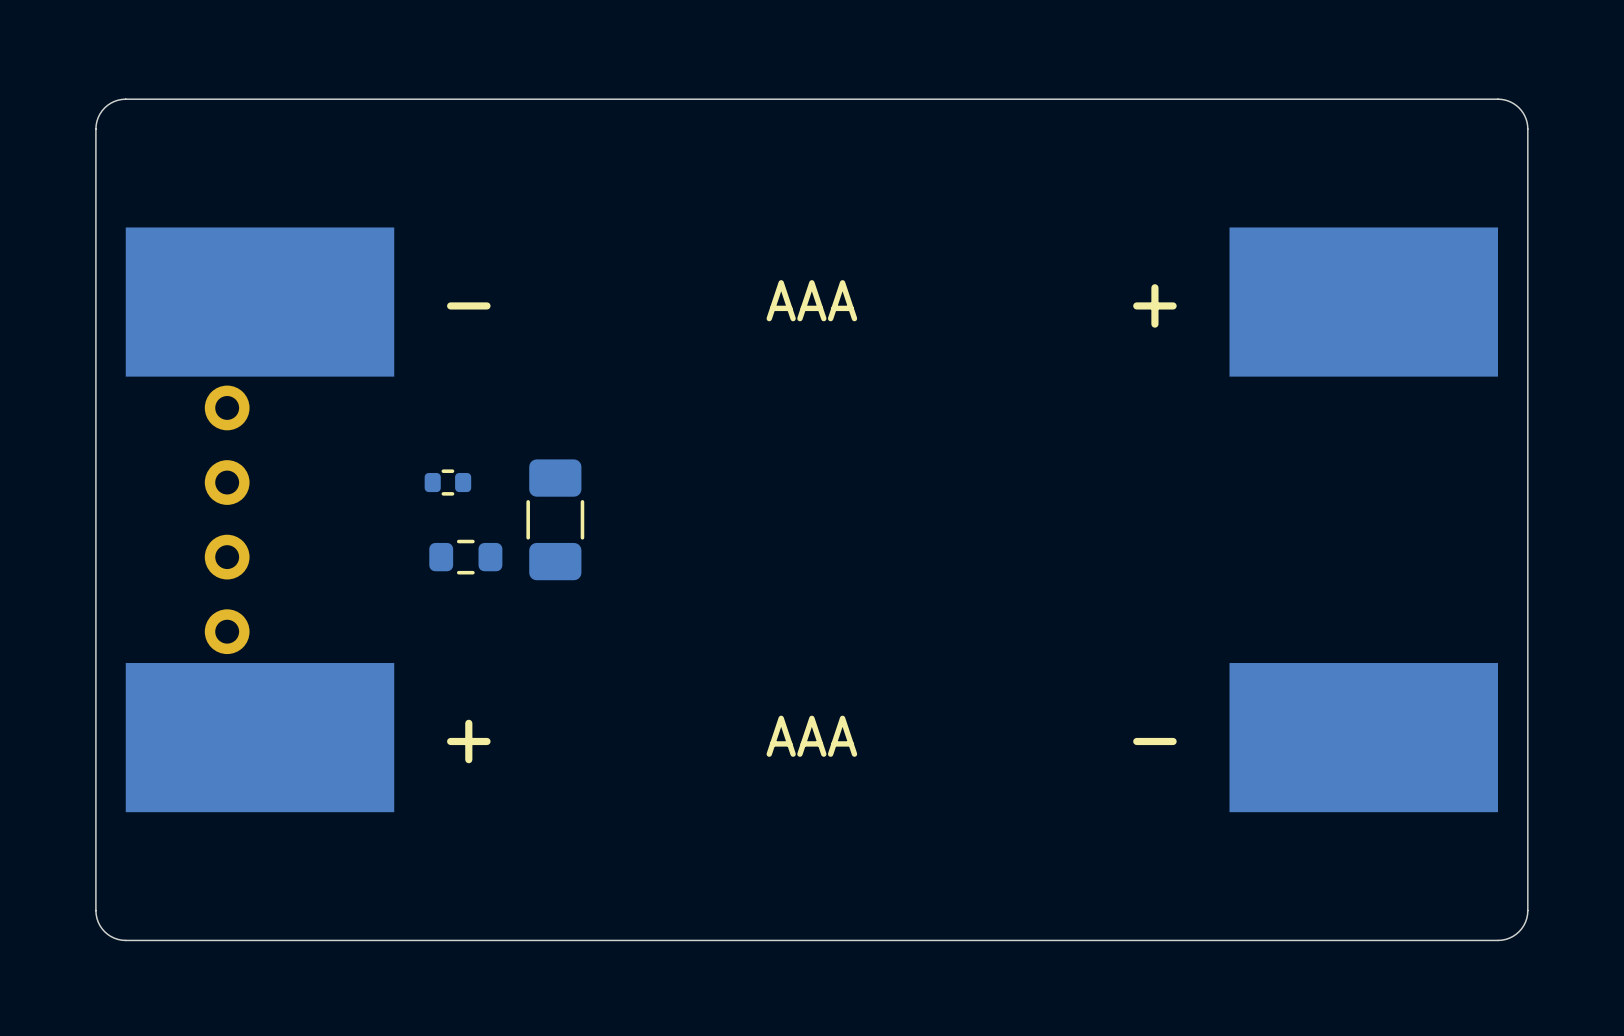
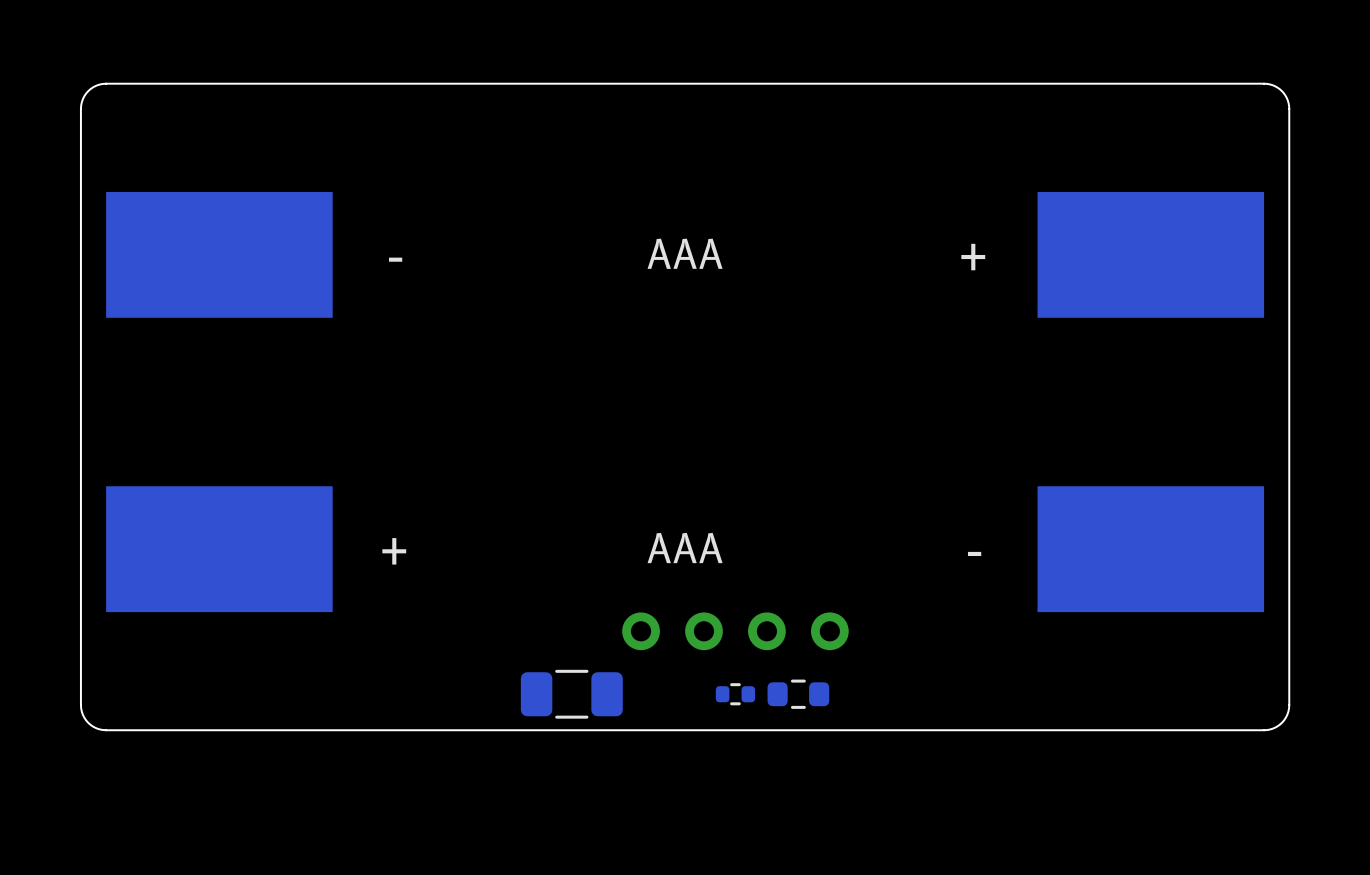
part position: (447, 482) -> (735, 694)
part rotation: 0° (227, 519) -> 90° clockwise (735, 631)
part position: (227, 519) -> (735, 631)
part rotation: 0° (555, 519) -> 90° clockwise (571, 694)
part position: (555, 519) -> (571, 694)
part position: (465, 557) -> (798, 694)
text position: AAA (811, 736) -> AAA (685, 548)
part position: (259, 737) -> (219, 549)
part position: (1363, 737) -> (1150, 549)
text position: + (468, 741) -> + (394, 551)
text position: - (1154, 741) -> - (974, 553)
board edge: (1527, 835) (1526, 918) (1523, 925) (1516, 934) (1509, 938) (1497, 940) (121, 940) (107, 934) (99, 925) (96, 918) (95, 835) -> (1289, 705) (1287, 714) (1281, 722) (1273, 728) (1264, 730) (106, 730) (96, 728) (88, 722) (82, 714) (80, 705)

